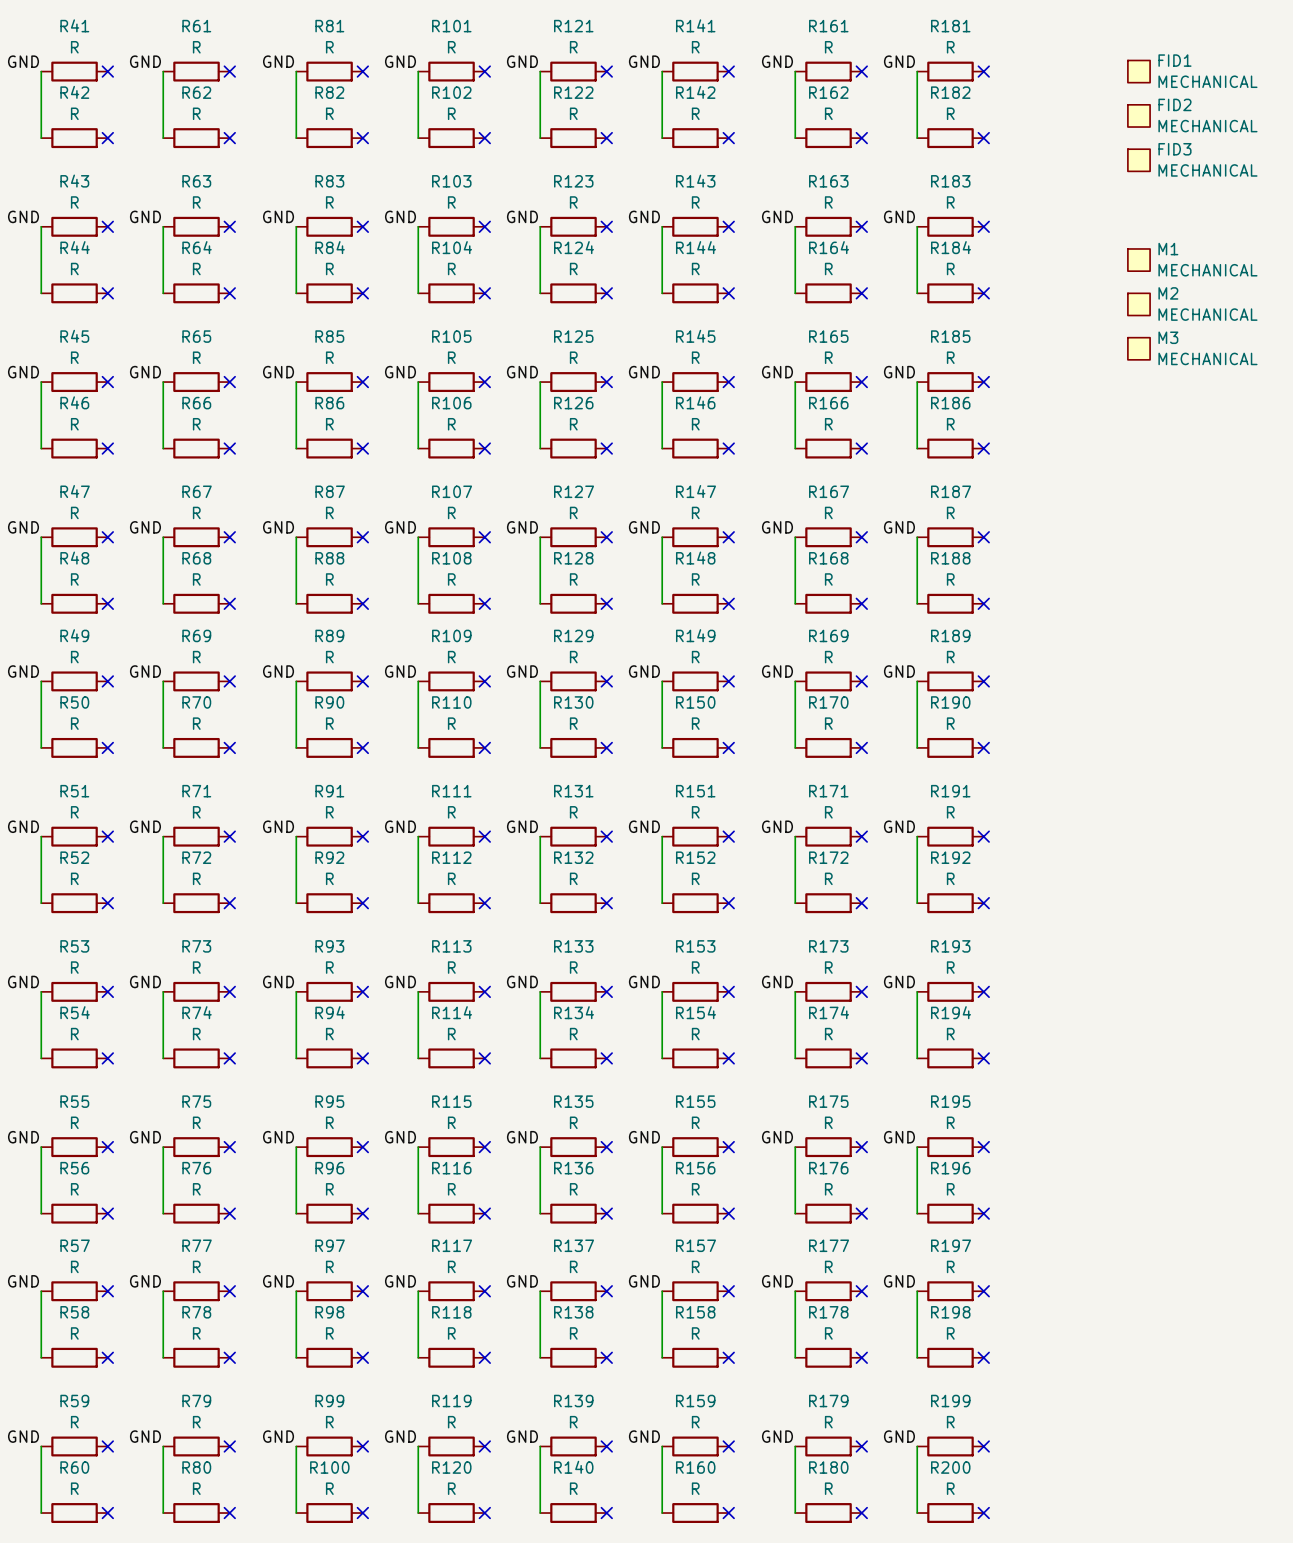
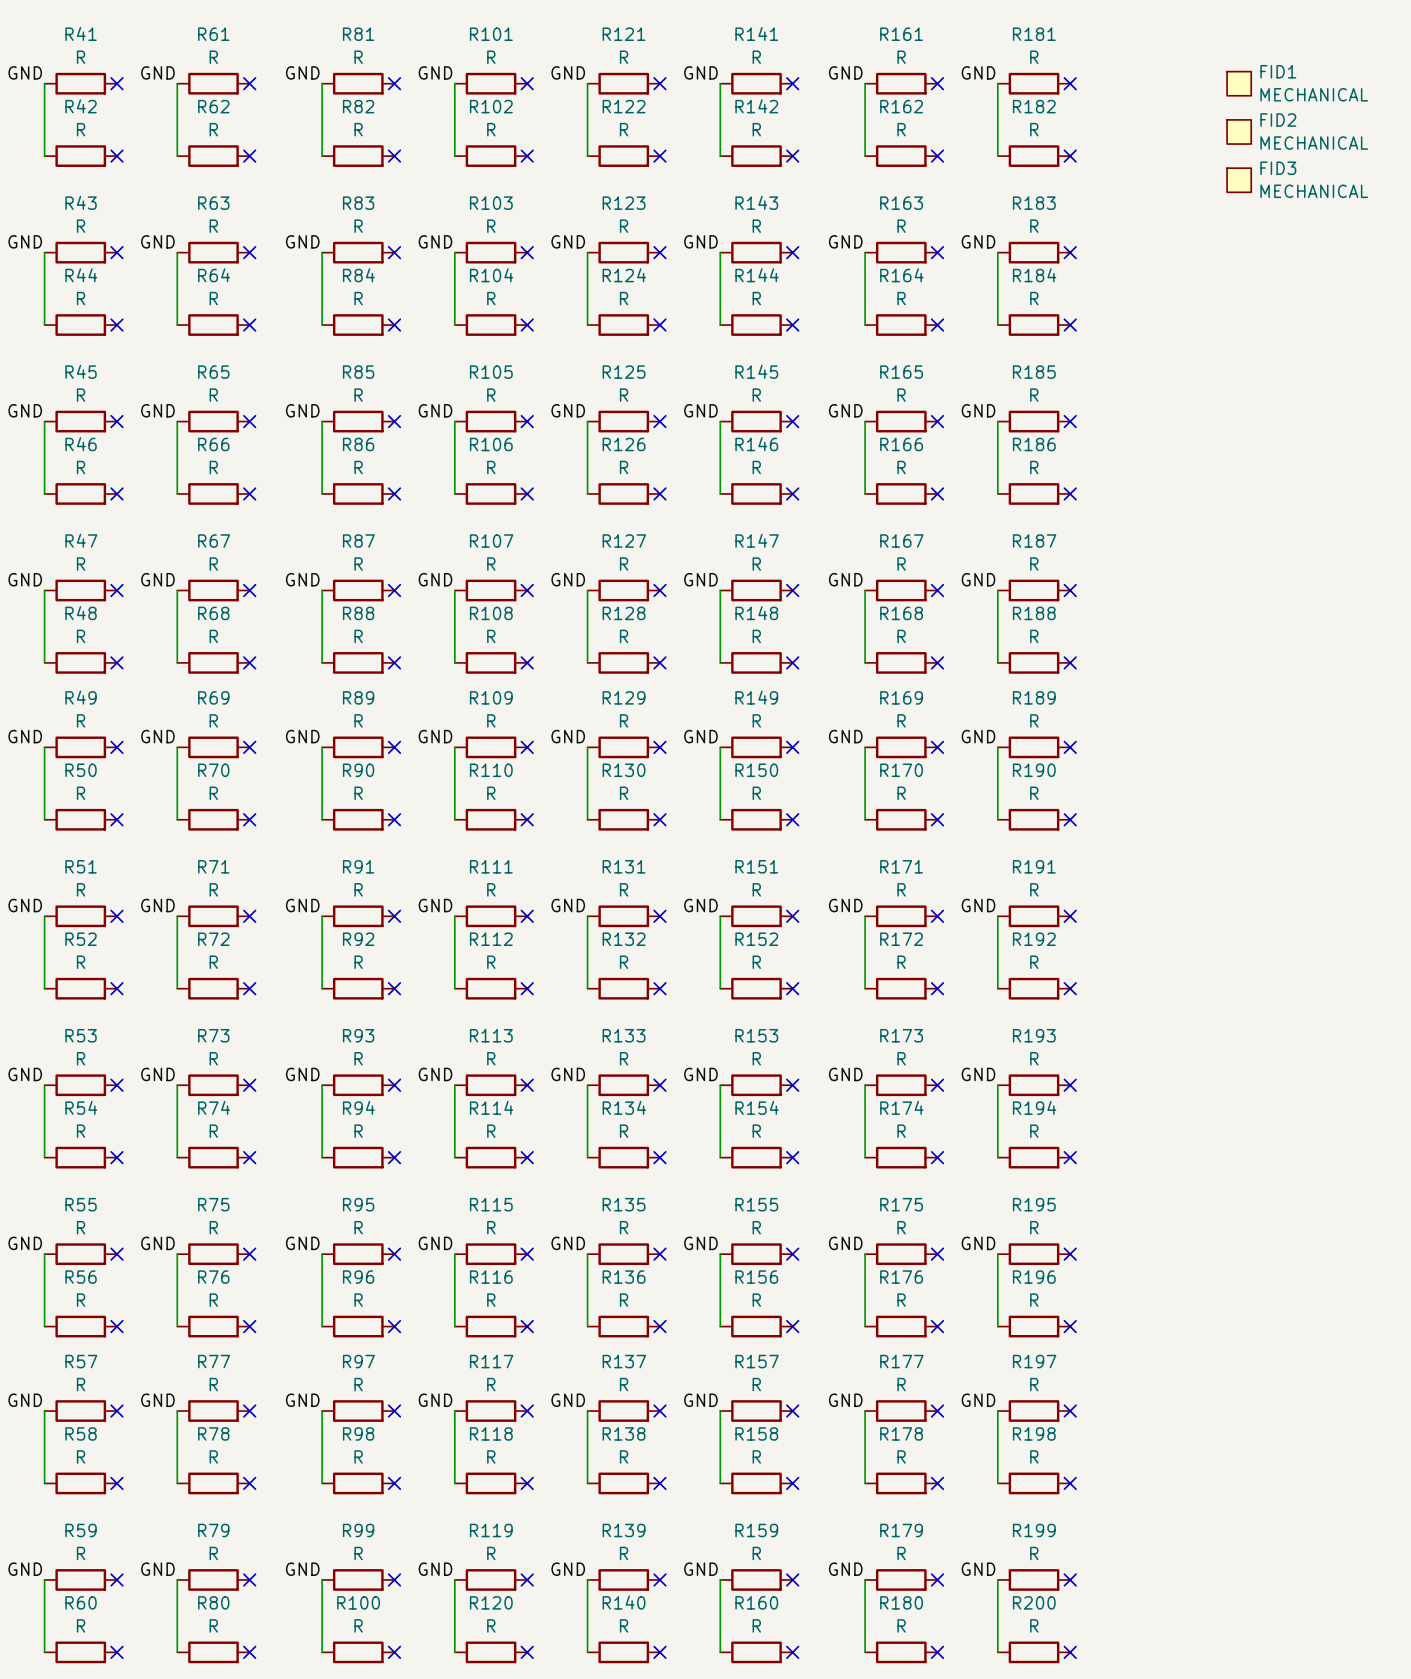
M1: MECHANICAL (1138, 260) -> none
M2: MECHANICAL (1138, 304) -> none
M3: MECHANICAL (1138, 348) -> none

